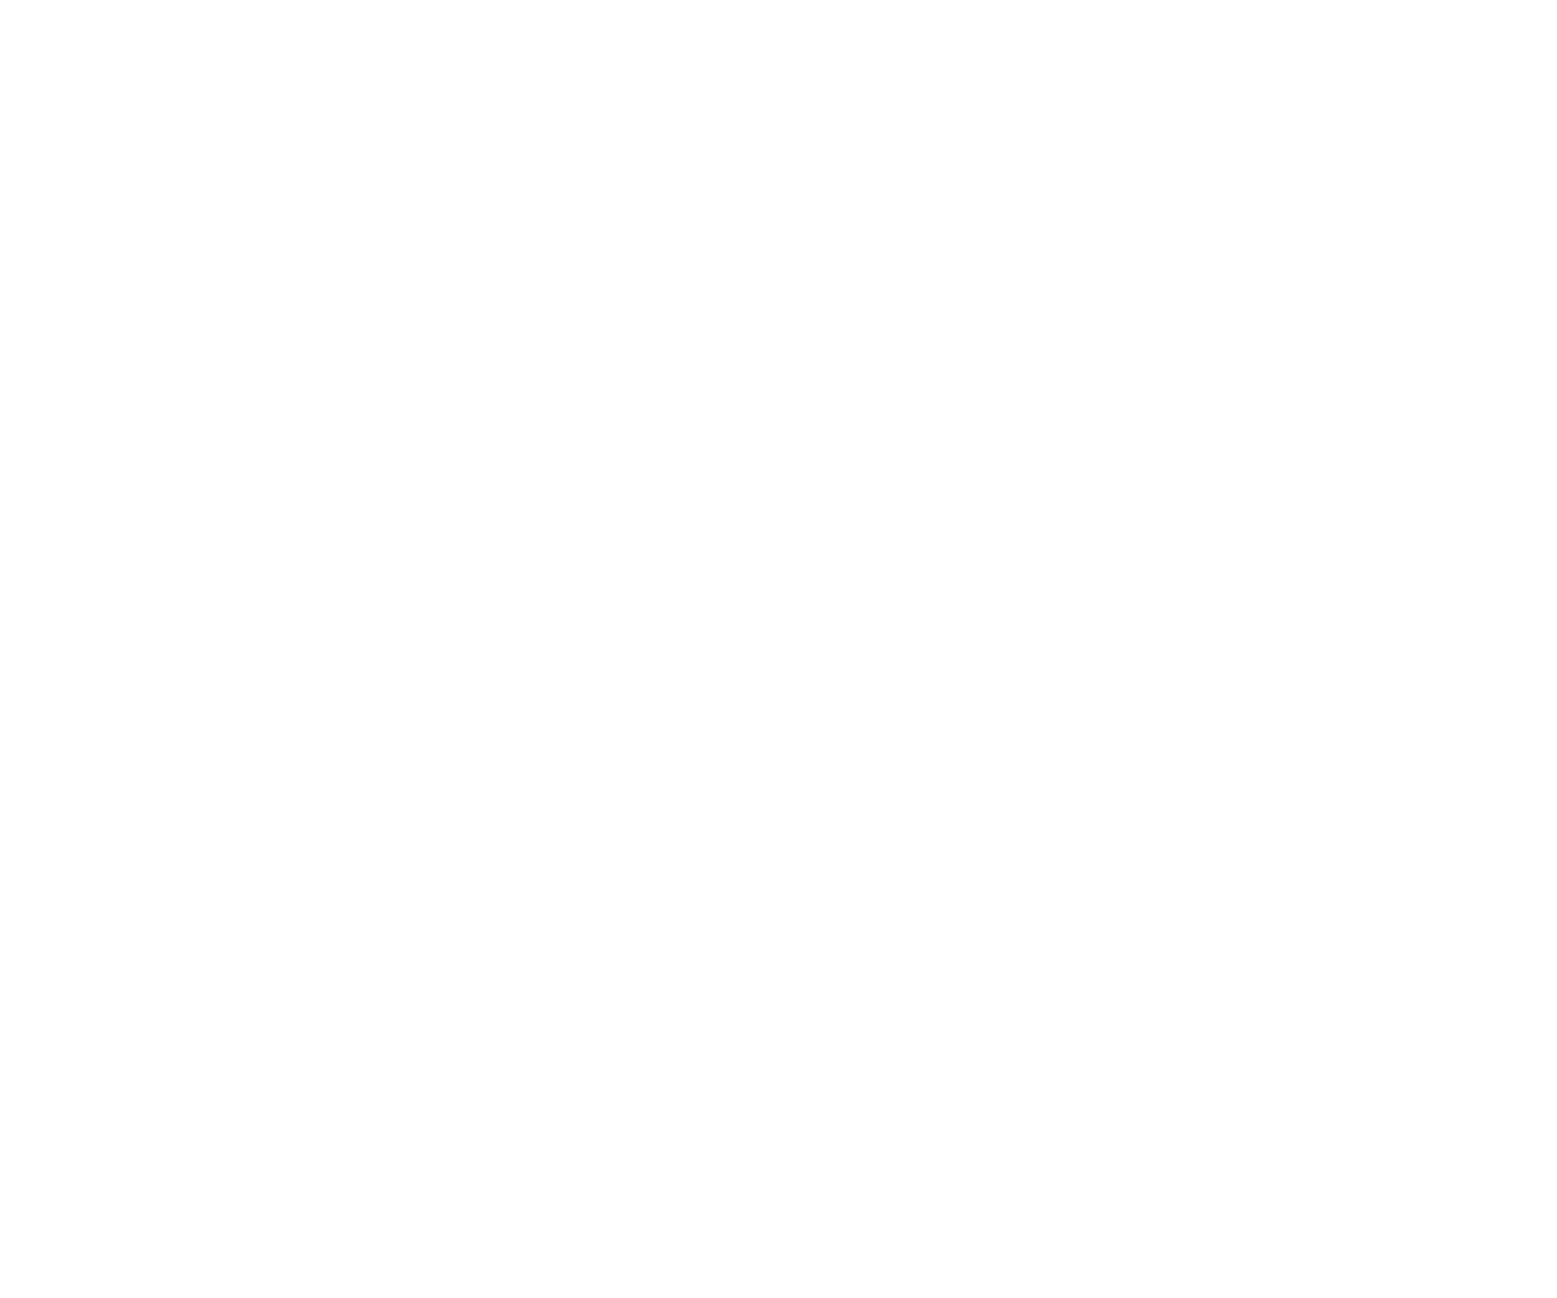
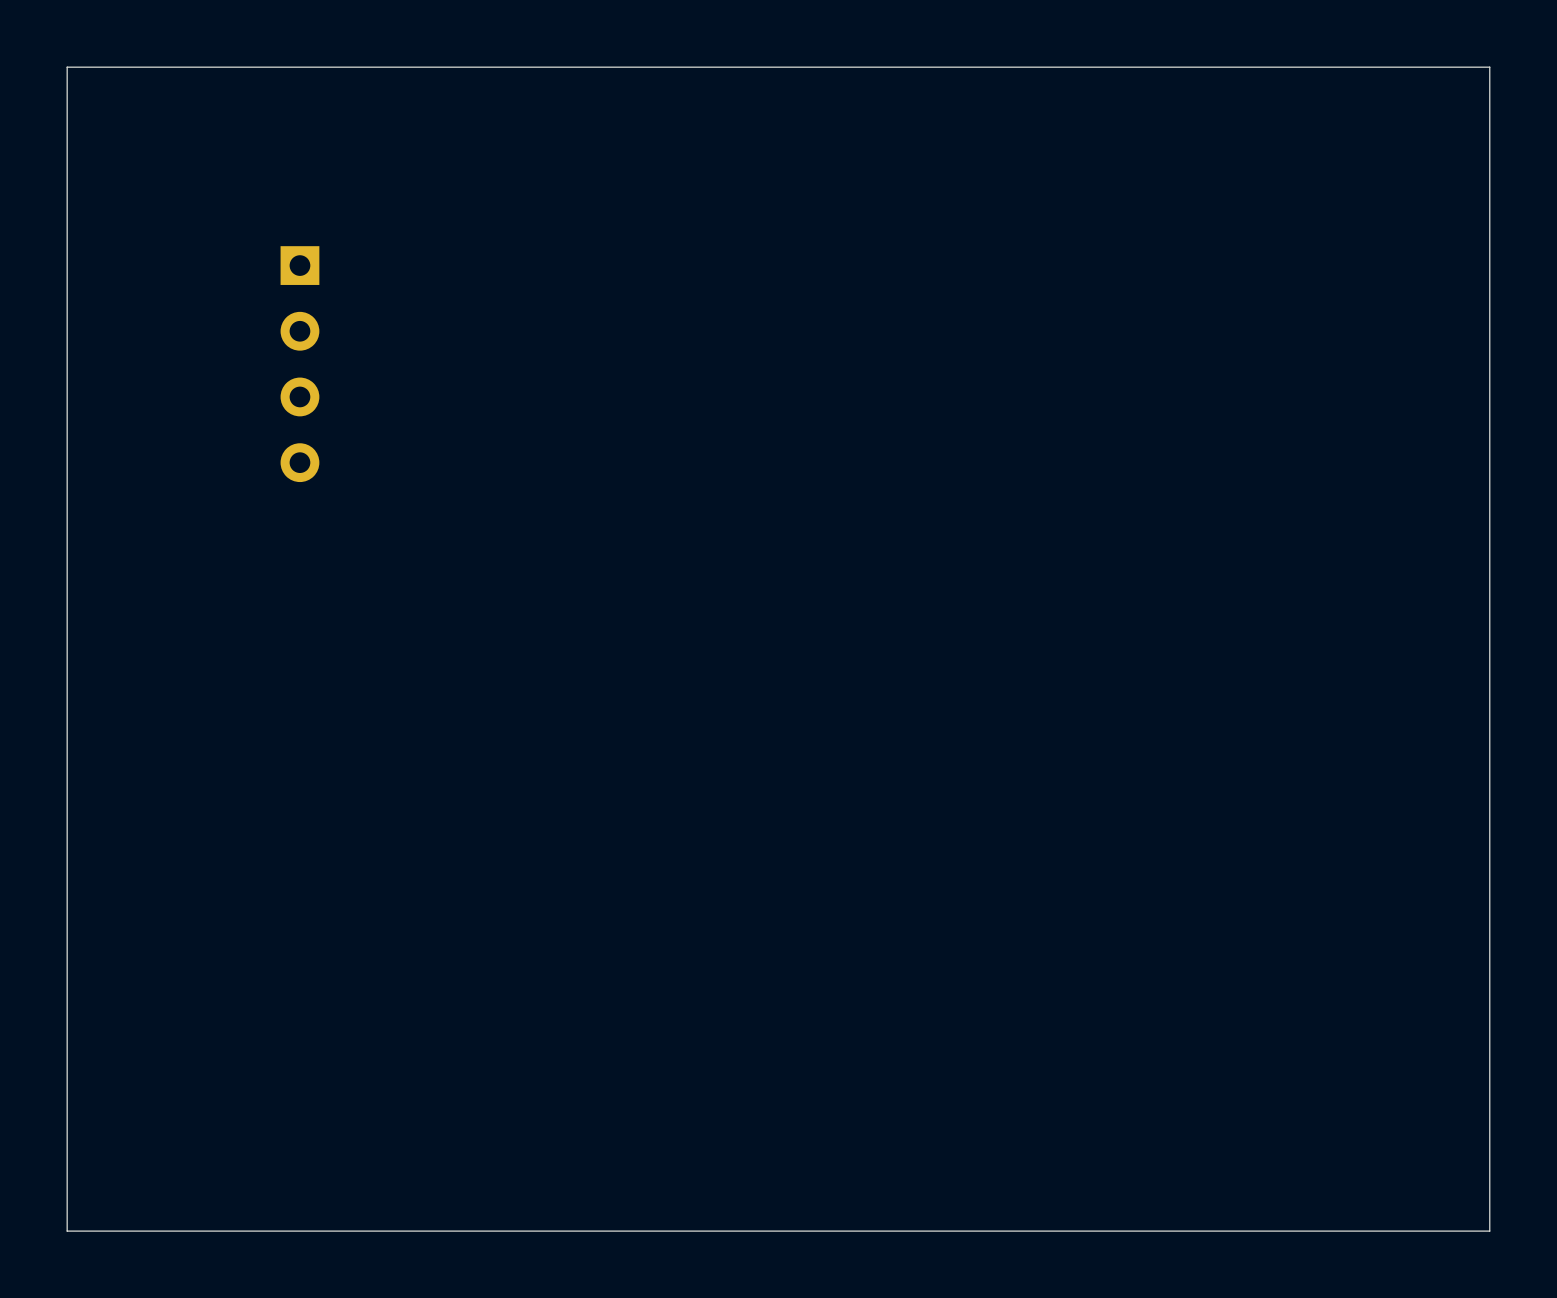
board edge: none -> (1489, 67) (67, 67) (67, 1231) (1489, 1231) (1489, 67)
part: none -> (299, 364)

